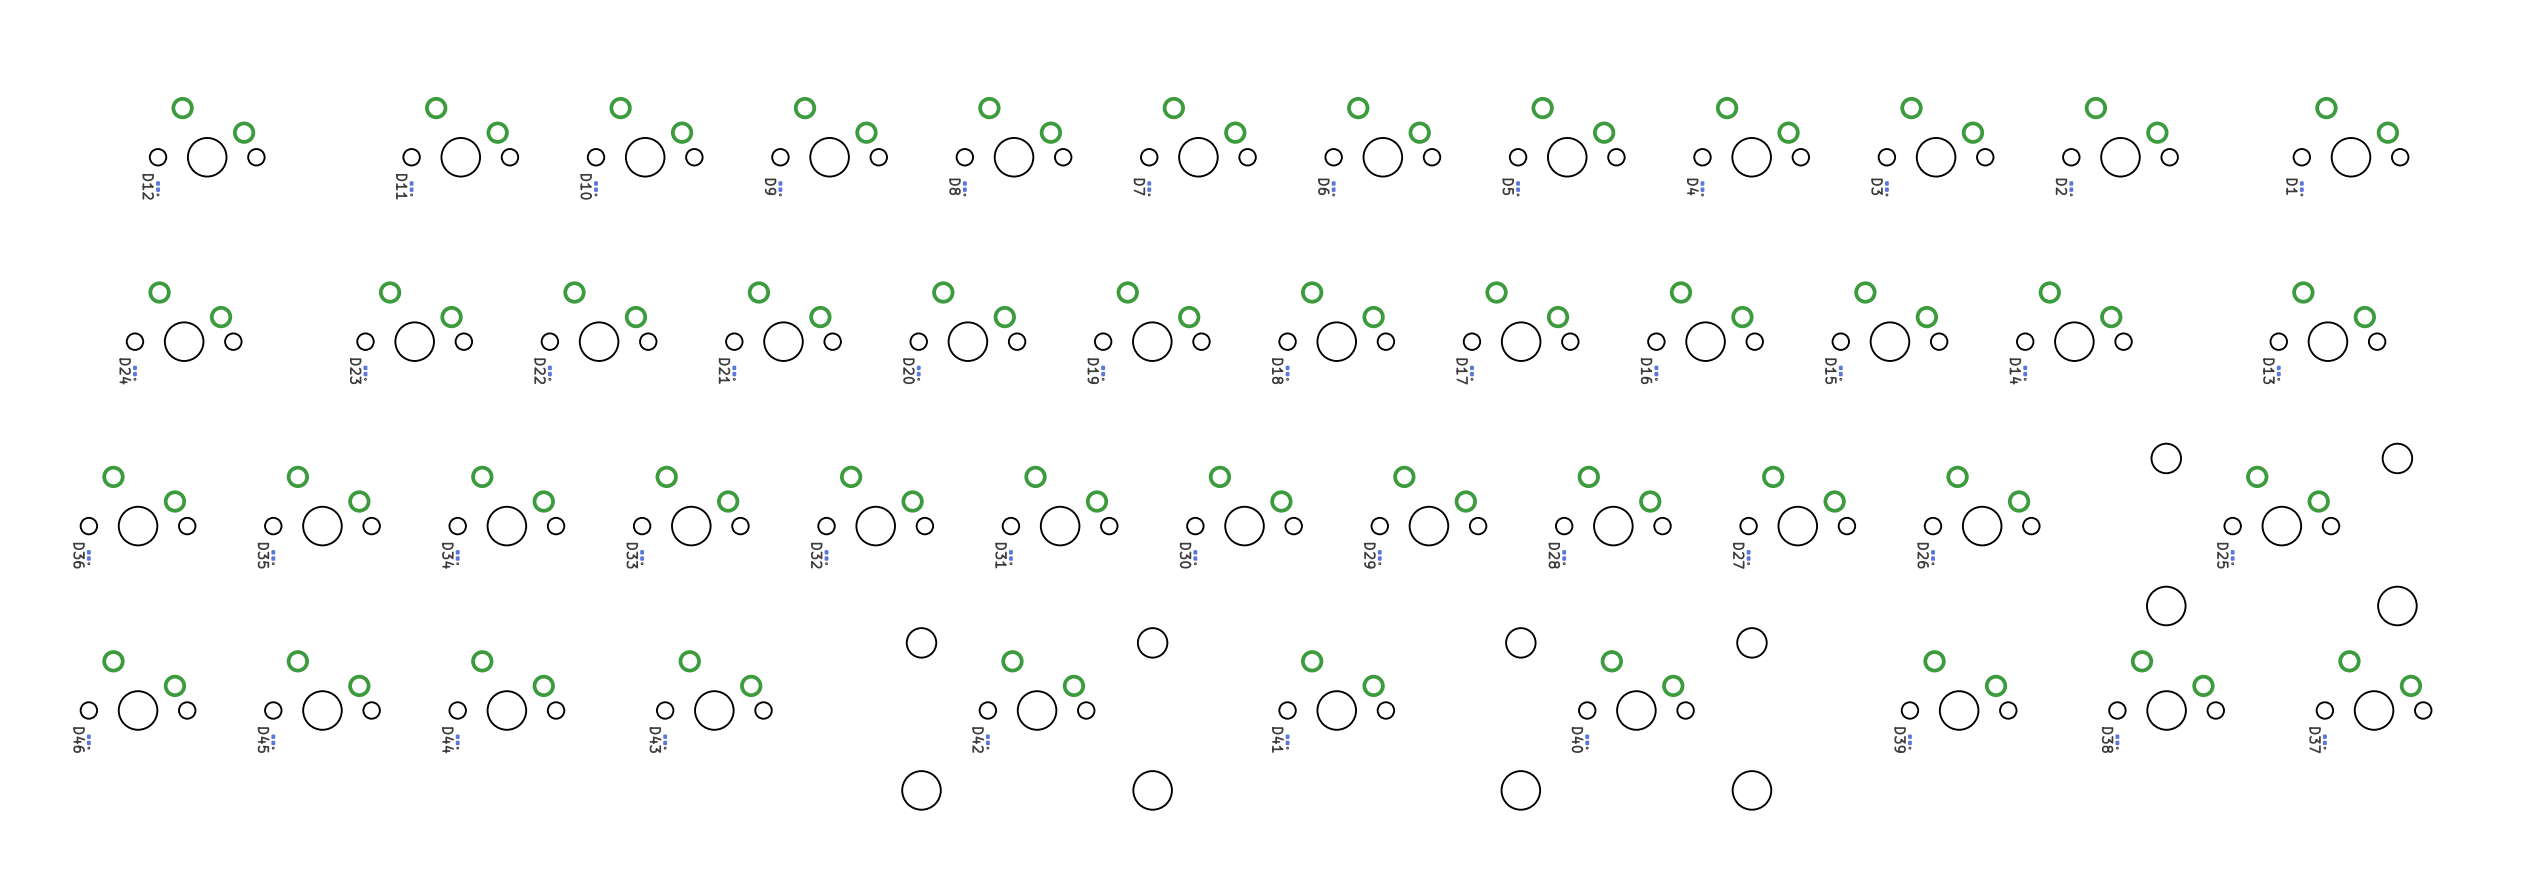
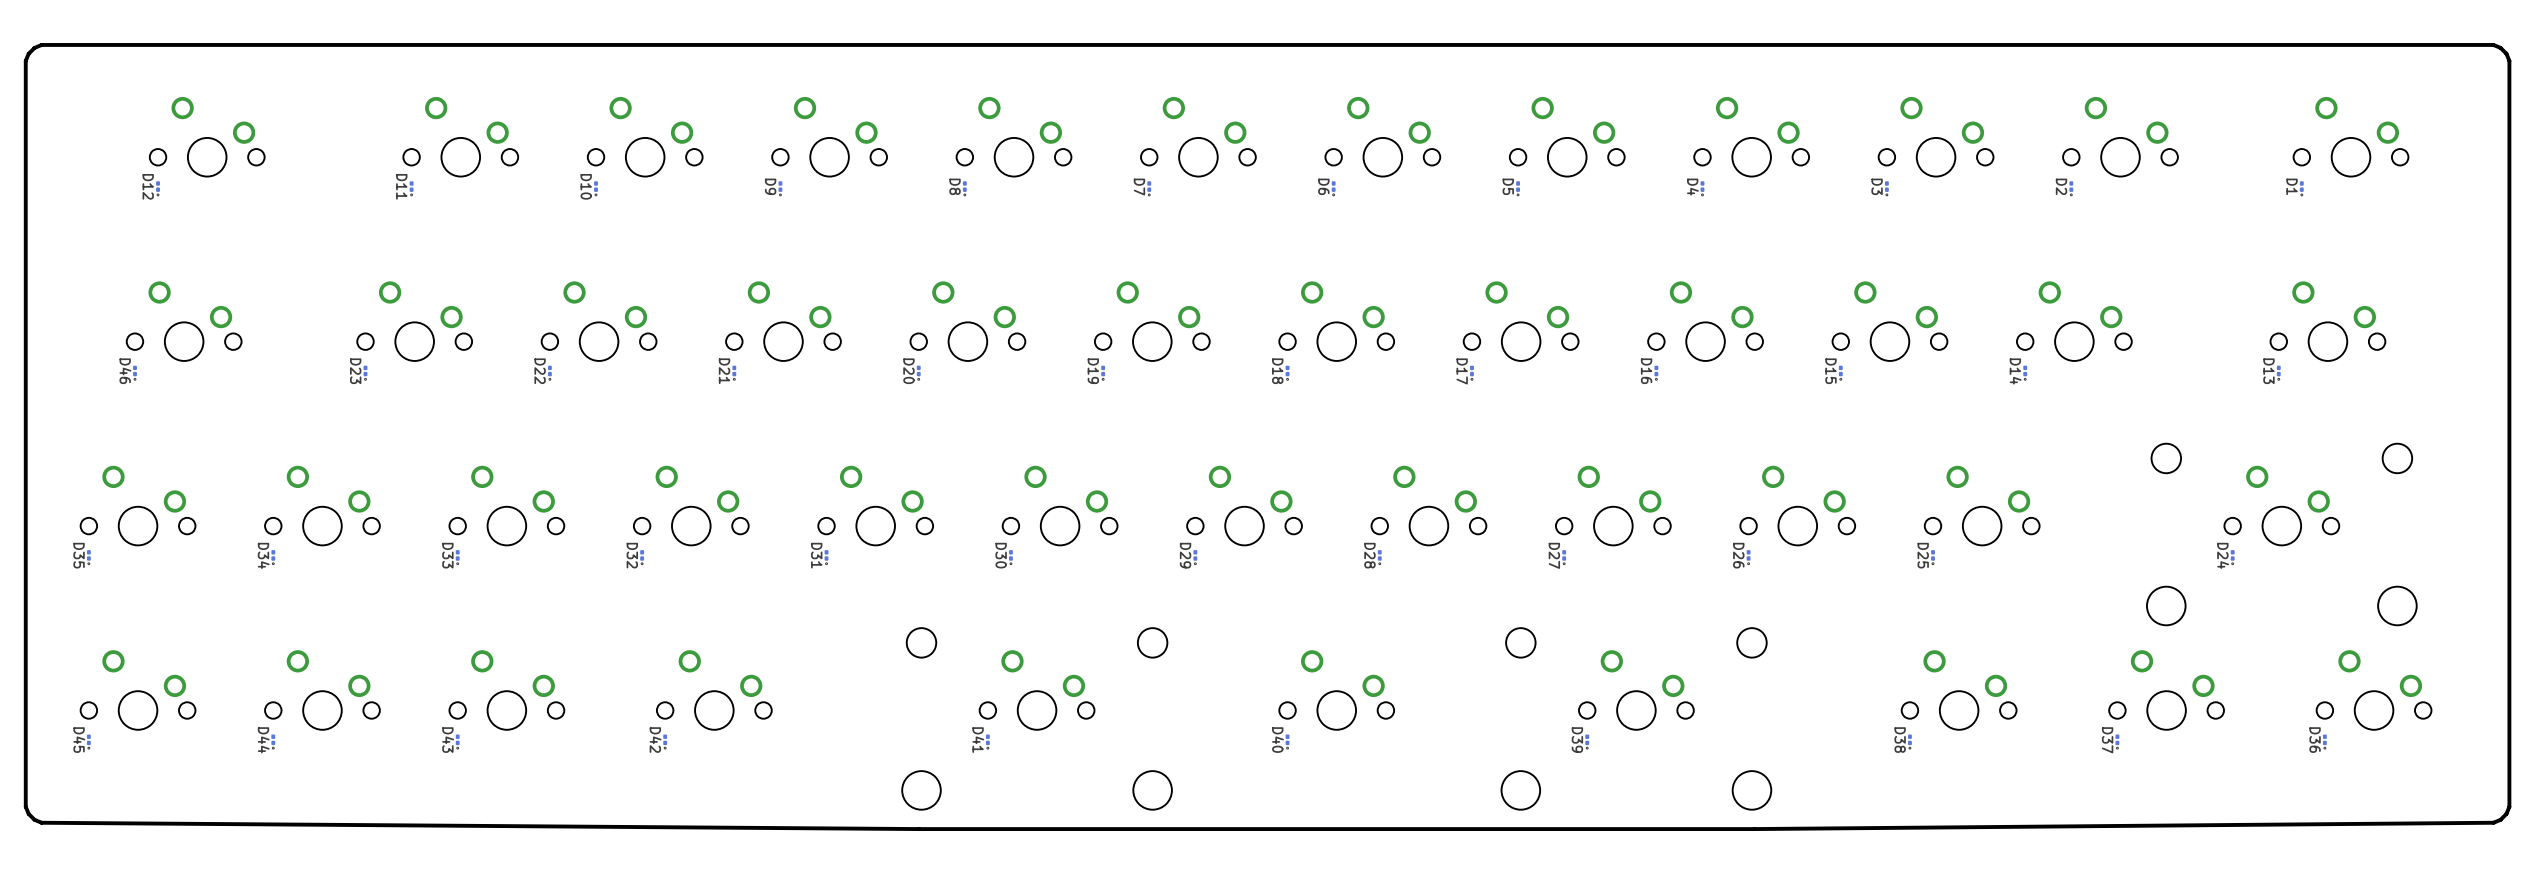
board edge: none -> (2493, 44) (2500, 47) (2506, 53) (2509, 60) (2509, 806) (2506, 813) (2500, 819) (2493, 822) (1754, 829) (918, 829) (41, 822) (34, 819) (28, 813) (25, 806) (25, 60) (28, 53) (34, 47) (41, 44) (2493, 44)
D24 name: D24 (125, 371) -> D46 (125, 371)
D36 name: D36 (79, 555) -> D35 (79, 555)
D35 name: D35 (263, 555) -> D34 (263, 555)
D34 name: D34 (448, 555) -> D33 (447, 555)
D33 name: D33 (632, 555) -> D32 (632, 555)
D32 name: D32 (816, 555) -> D31 (816, 555)
D31 name: D31 (1001, 555) -> D30 (1001, 555)
D30 name: D30 (1185, 555) -> D29 (1185, 555)
D29 name: D29 (1369, 555) -> D28 (1369, 555)
D28 name: D28 (1554, 555) -> D27 (1554, 555)
D27 name: D27 (1738, 555) -> D26 (1738, 555)
D26 name: D26 (1923, 555) -> D25 (1923, 555)
D25 name: D25 (2222, 555) -> D24 (2223, 555)
D46 name: D46 (79, 740) -> D45 (79, 740)
D45 name: D45 (263, 740) -> D44 (263, 740)
D44 name: D44 (448, 740) -> D43 (448, 740)
D43 name: D43 (655, 740) -> D42 (655, 740)
D42 name: D42 (978, 740) -> D41 (978, 740)
D41 name: D41 (1277, 740) -> D40 (1277, 740)
D40 name: D40 (1577, 740) -> D39 (1577, 740)
D39 name: D39 (1900, 740) -> D38 (1900, 740)
D38 name: D38 (2107, 740) -> D37 (2107, 740)
D37 name: D37 (2315, 740) -> D36 (2315, 740)

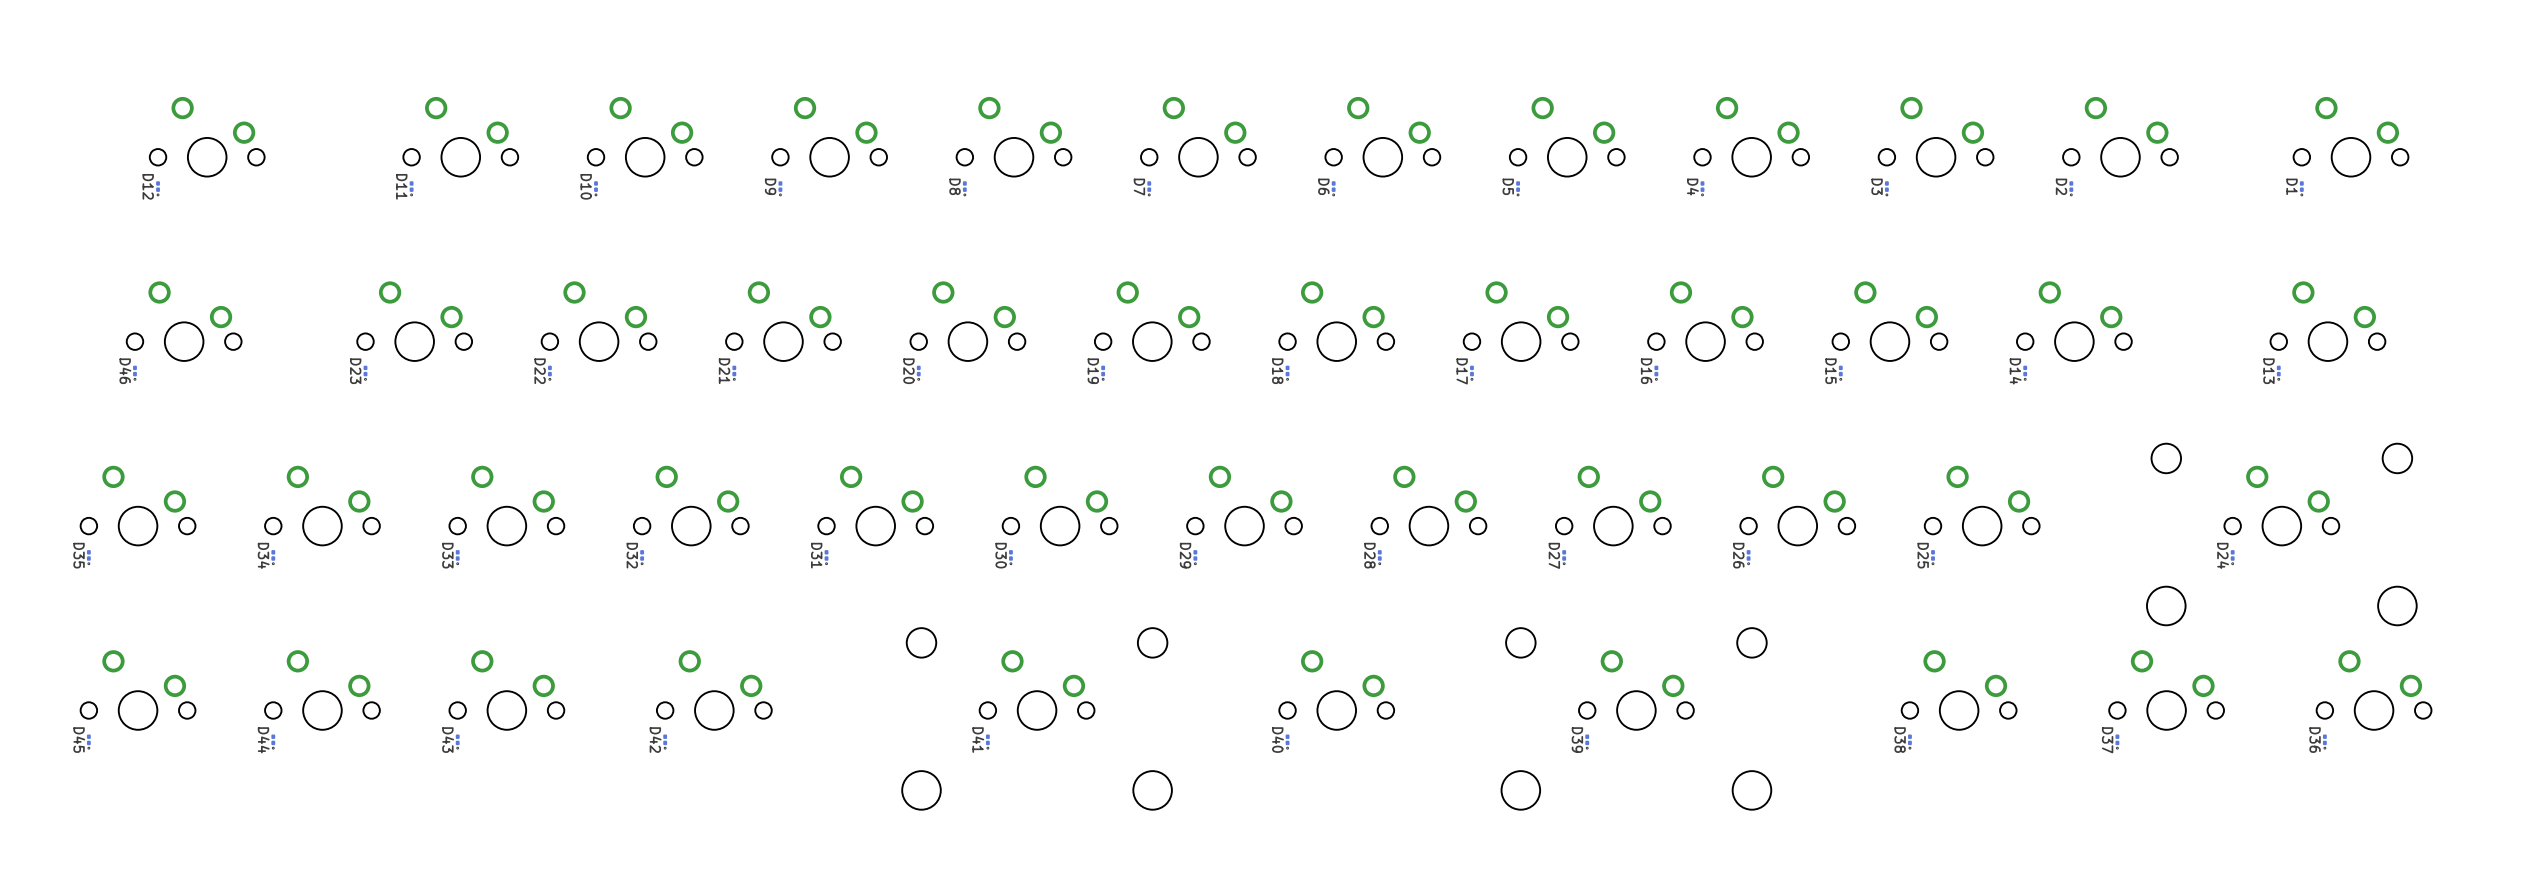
board edge: (2493, 44) (2500, 47) (2506, 53) (2509, 60) (2509, 806) (2506, 813) (2500, 819) (2493, 822) (1754, 829) (918, 829) (41, 822) (34, 819) (28, 813) (25, 806) (25, 60) (28, 53) (34, 47) (41, 44) (2493, 44) -> none

